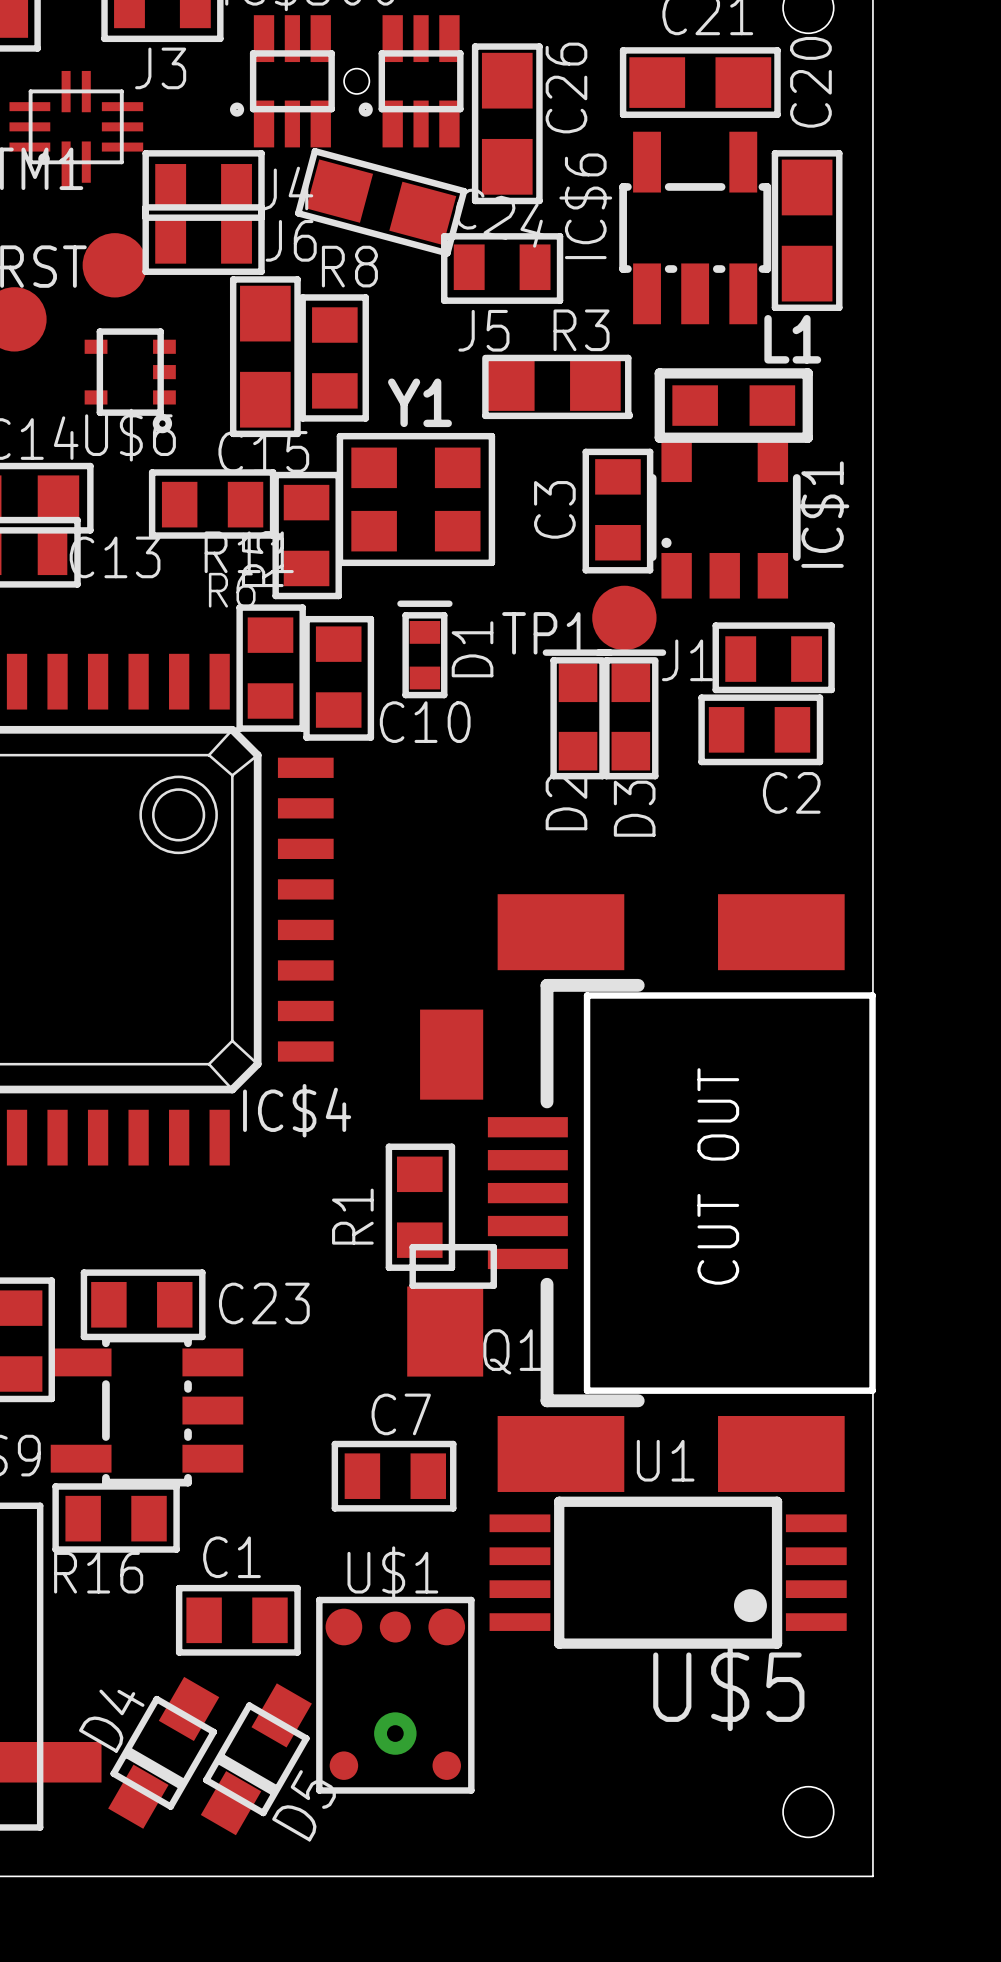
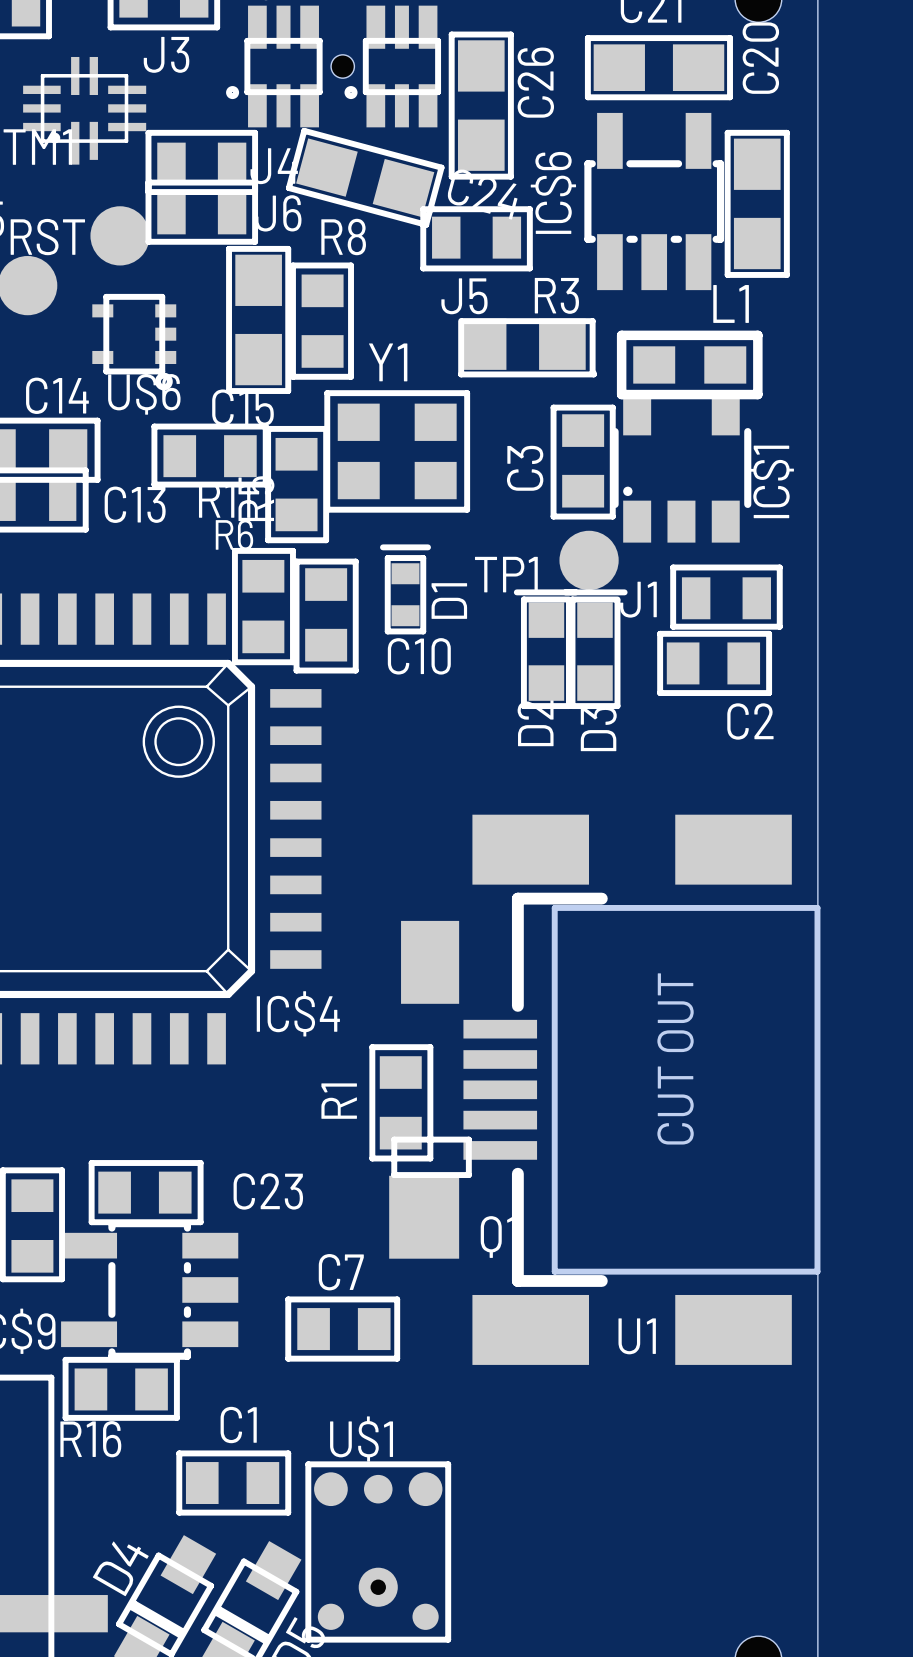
C7 position: (394, 1476) -> (342, 1329)
U$5: (668, 1572) -> none

